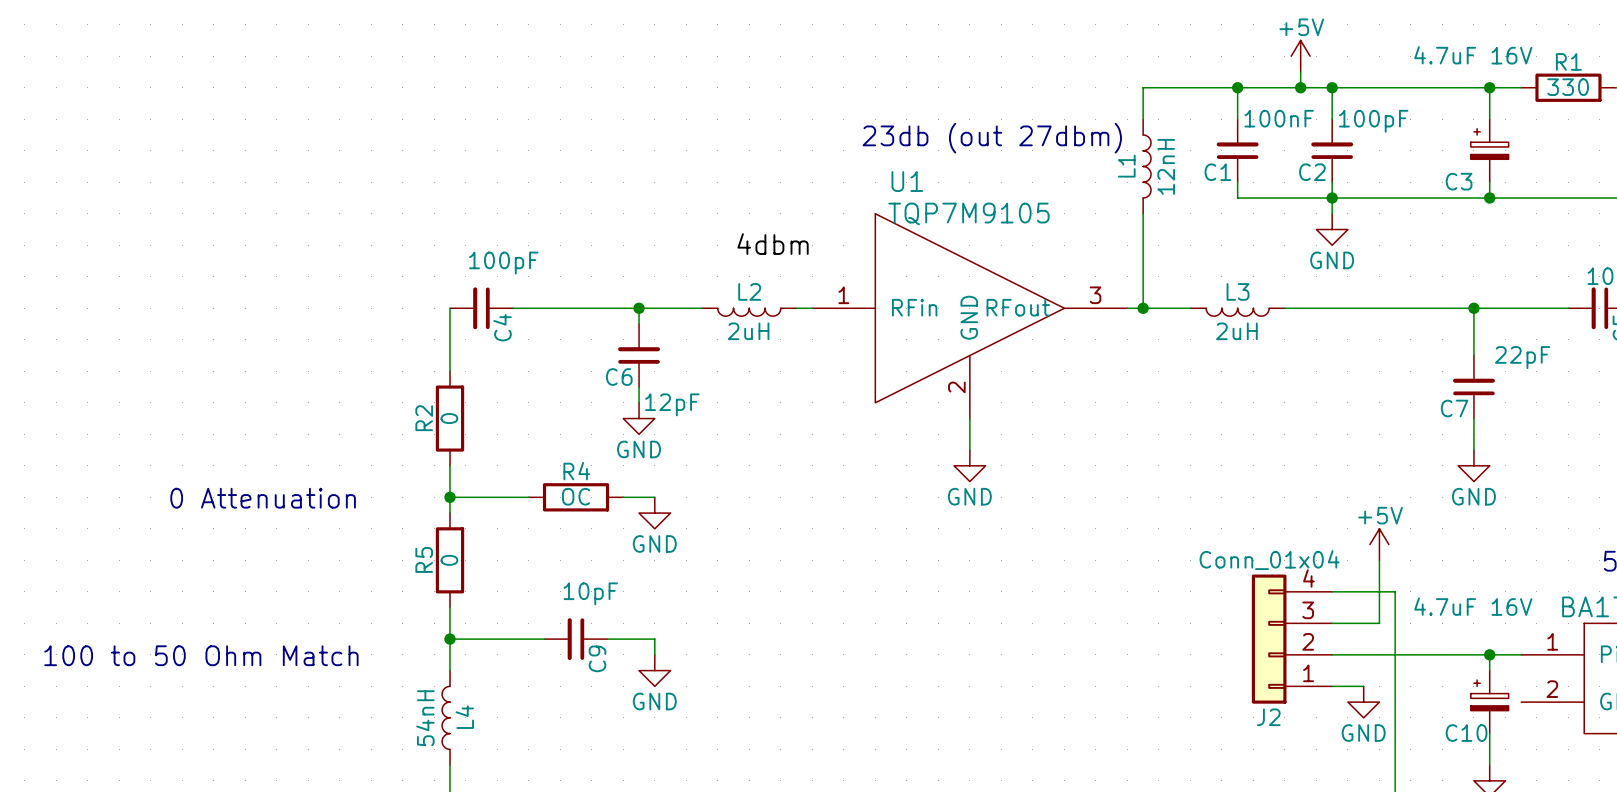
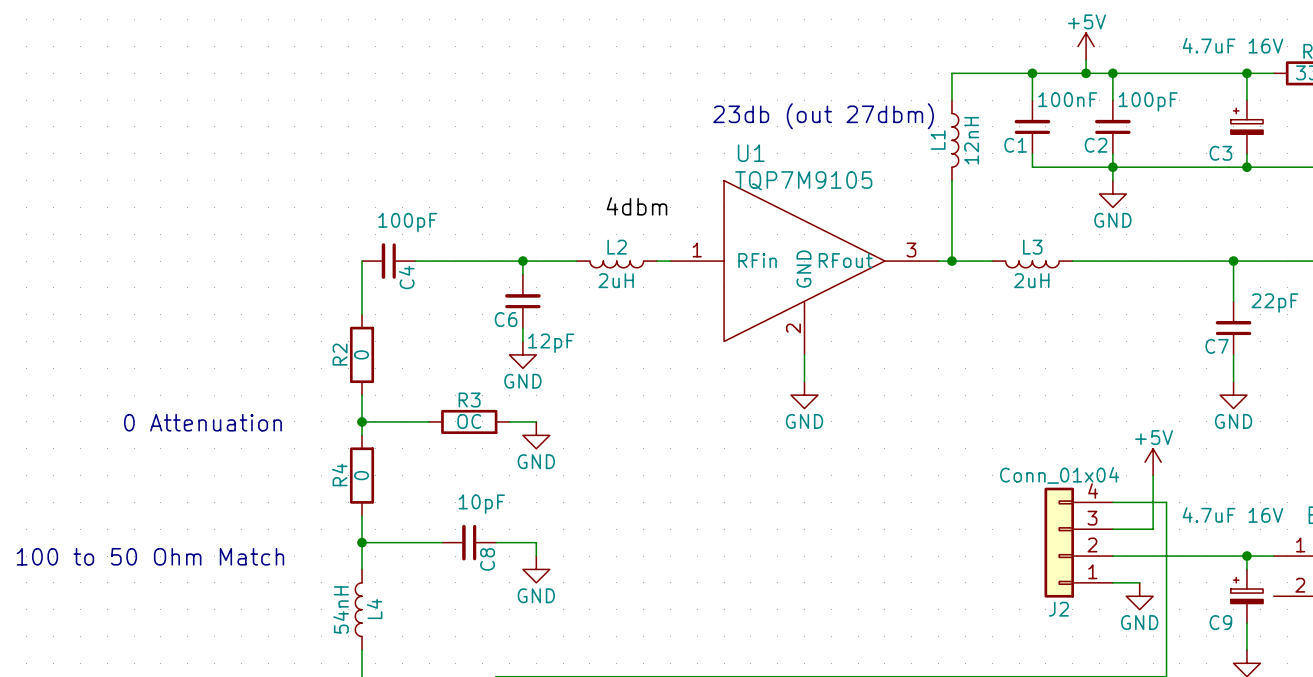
R4 name: R4 (576, 471) -> R3 (469, 400)
R5 name: R5 (424, 559) -> R4 (339, 474)
C9 name: C9 (597, 658) -> C8 (487, 559)
C10 name: C10 (1466, 733) -> C9 (1220, 622)

